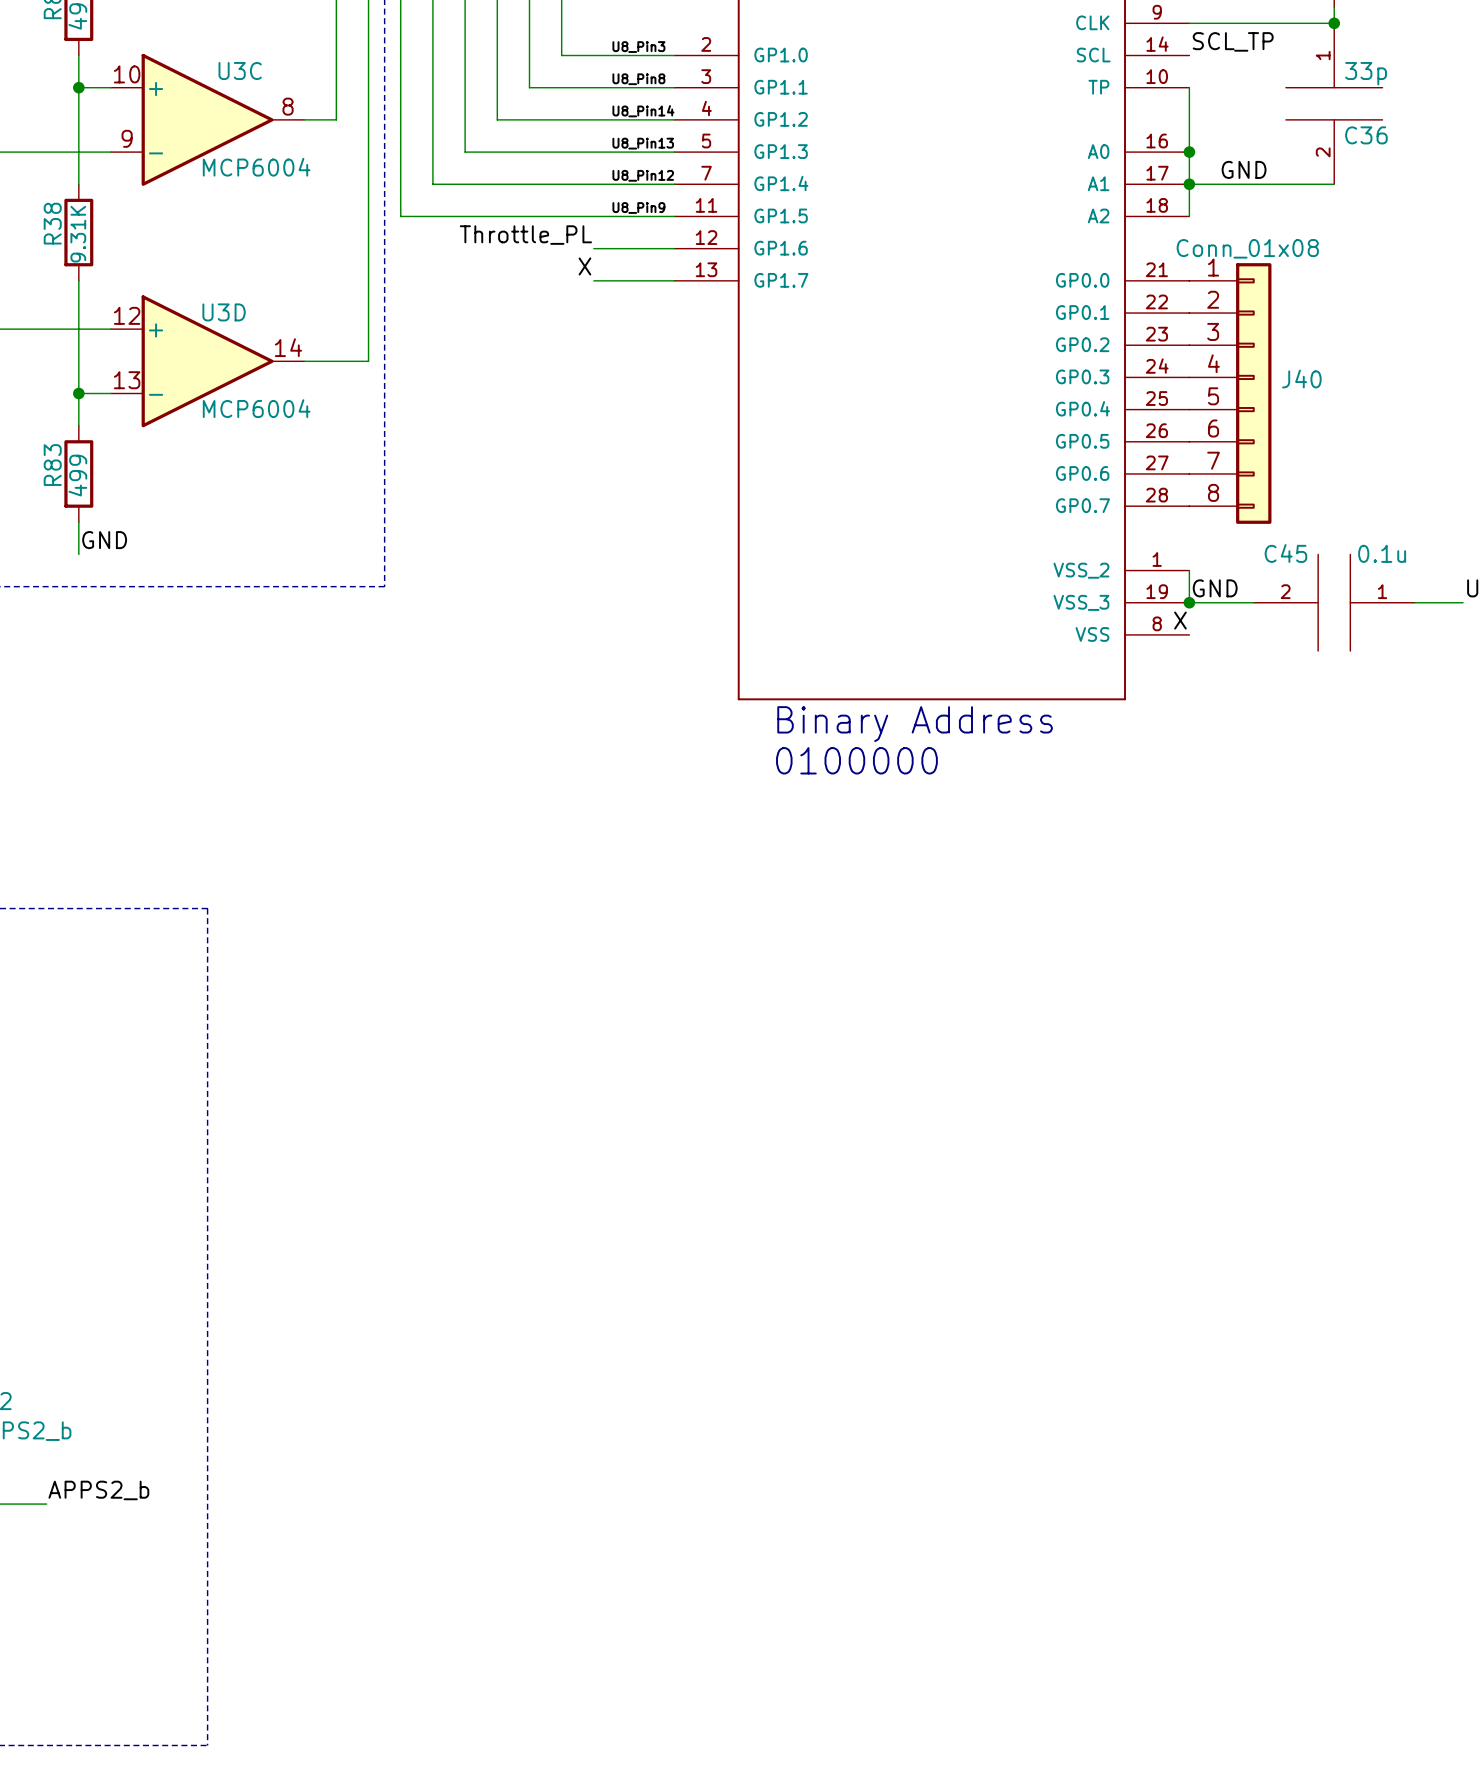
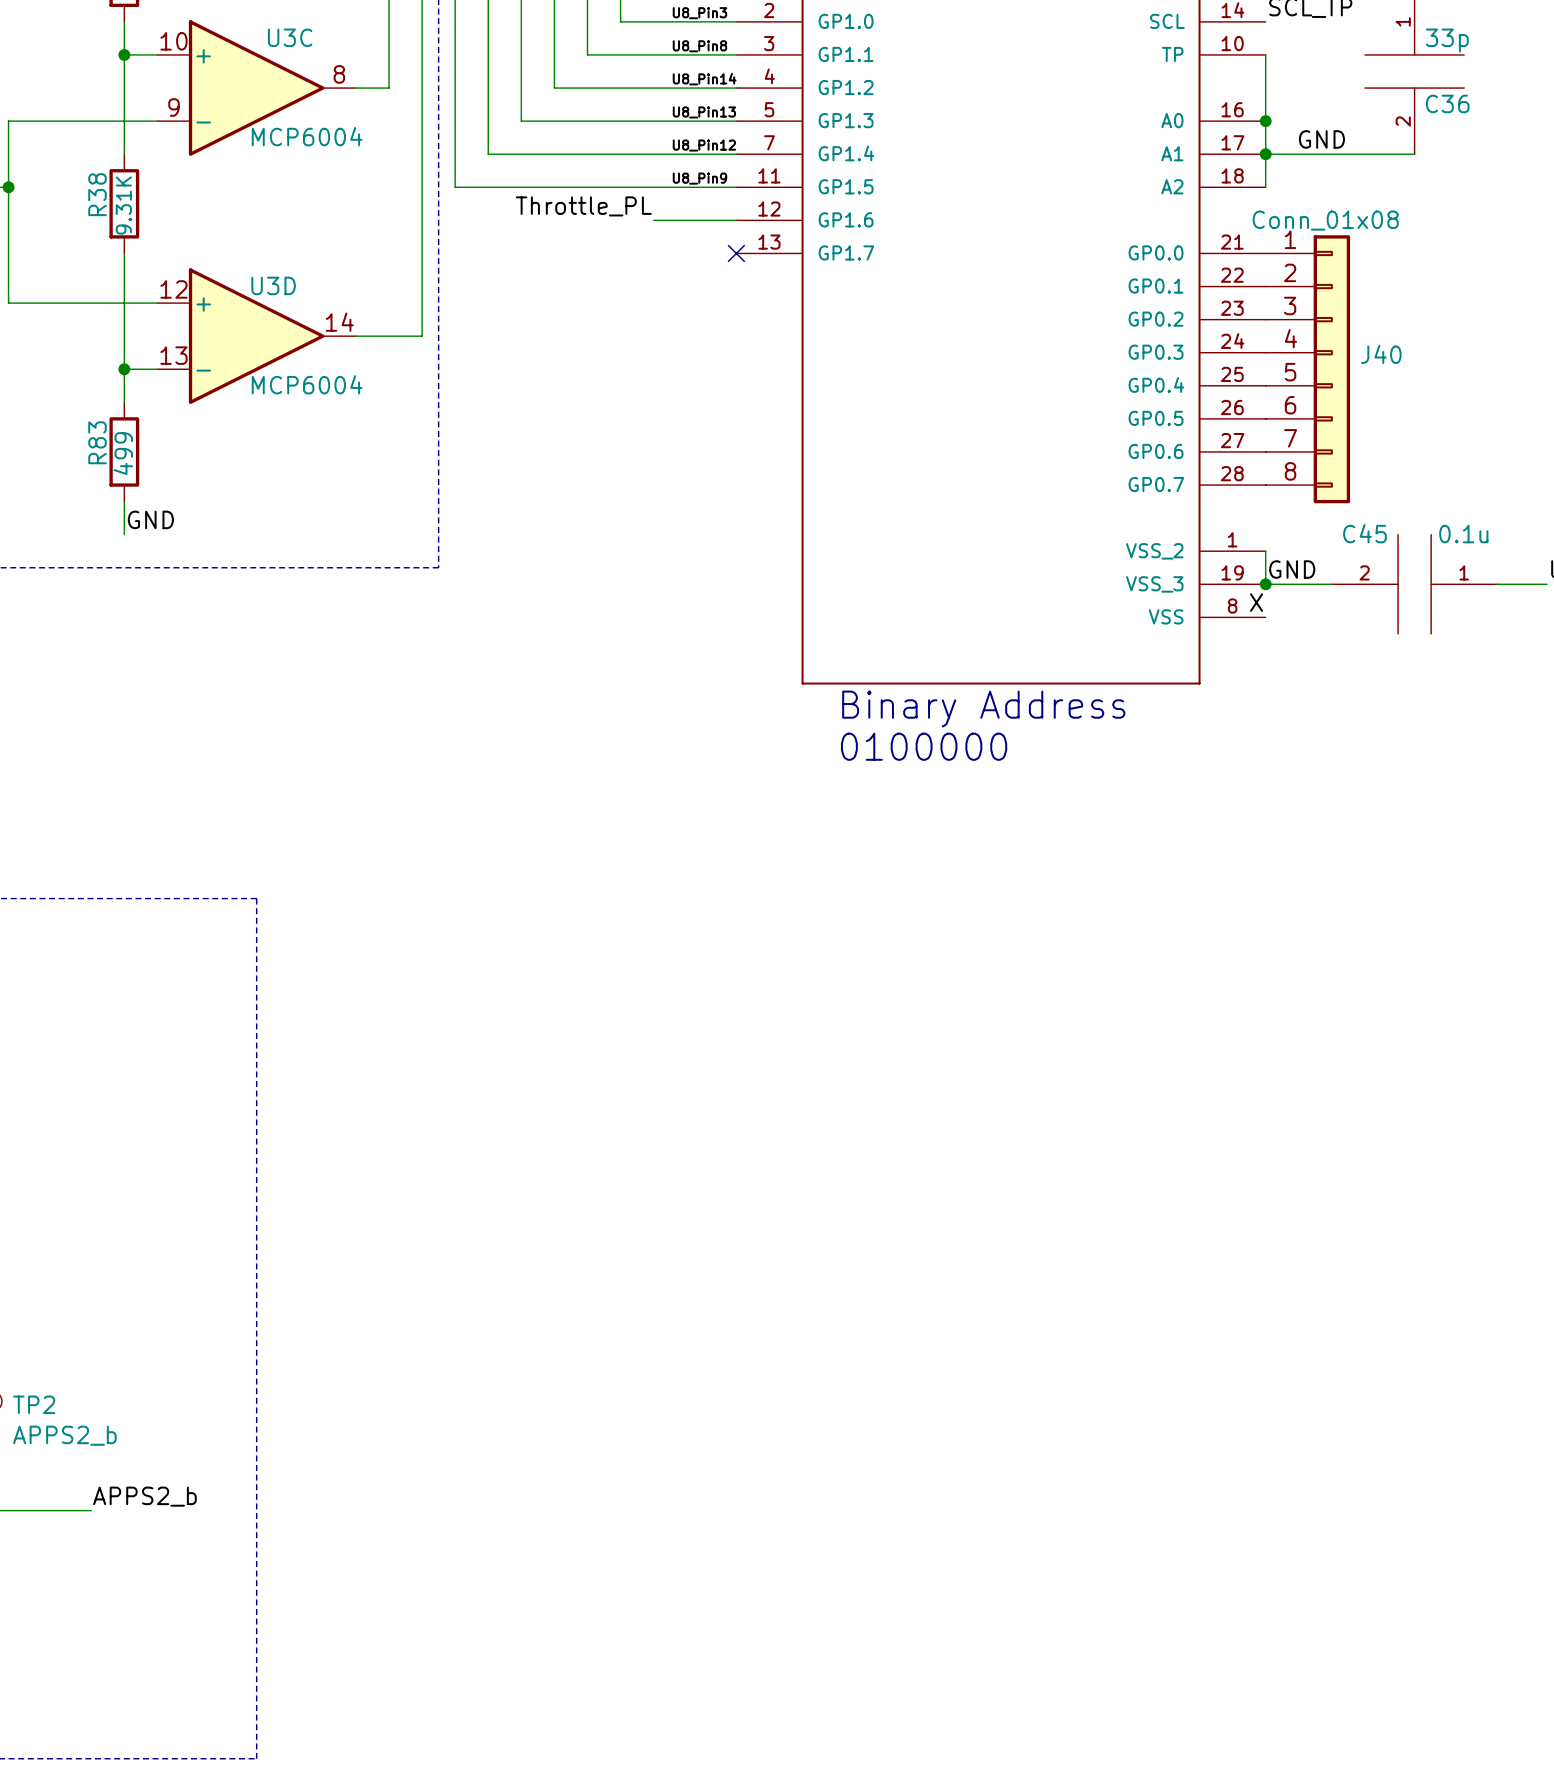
label: X (584, 266) -> none
wire: (593, 280) (674, 280) -> none
no-connect mark: none -> (736, 253)

